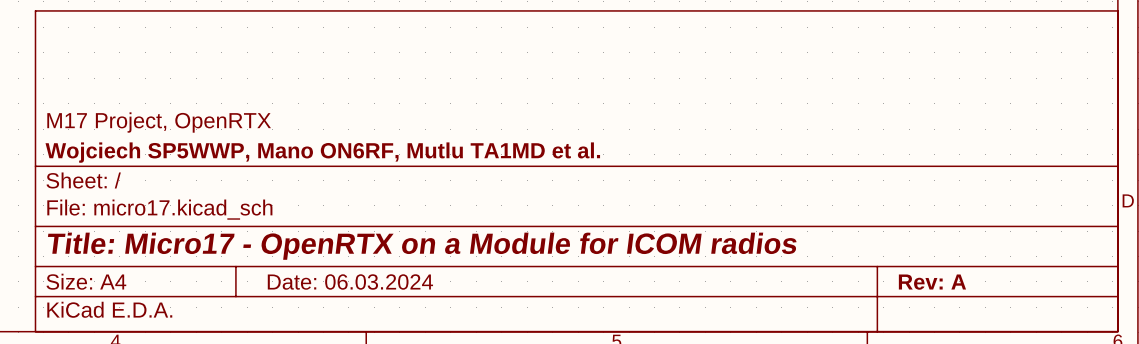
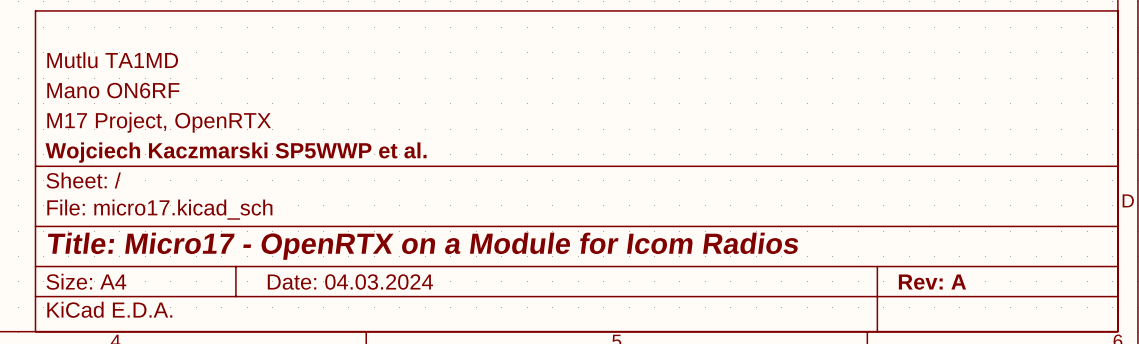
title block: none -> Mutlu TA1MD (112, 60)
title block: none -> Mano ON6RF (113, 90)
title block: Wojciech SP5WWP, Mano ON6RF, Mutlu TA1MD et al. (322, 152) -> Wojciech Kaczmarski SP5WWP et al. (236, 152)
title block: Title: Micro17 - OpenRTX on a Module for ICOM radios (422, 246) -> Title: Micro17 - OpenRTX on a Module for Icom Radios (423, 246)
title block: Date: 06.03.2024 (350, 282) -> Date: 04.03.2024 (350, 282)

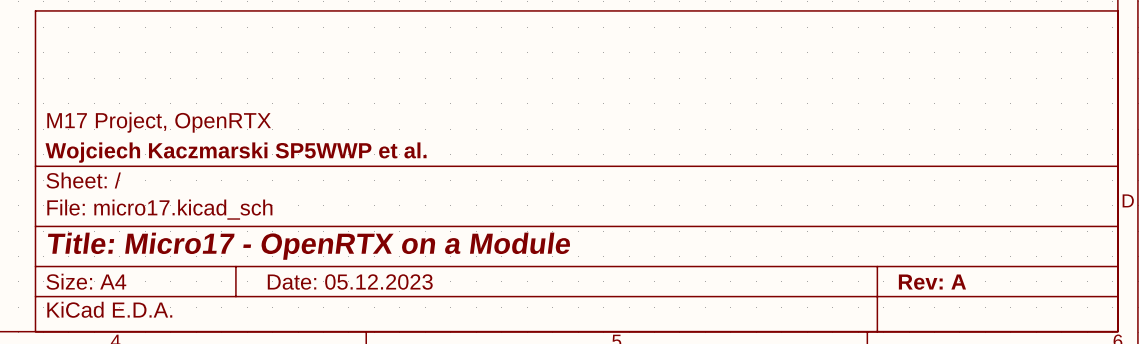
title block: Mutlu TA1MD (112, 60) -> none
title block: Mano ON6RF (113, 90) -> none
title block: Title: Micro17 - OpenRTX on a Module for Icom Radios (423, 246) -> Title: Micro17 - OpenRTX on a Module (309, 246)
title block: Date: 04.03.2024 (350, 282) -> Date: 05.12.2023 (350, 282)

